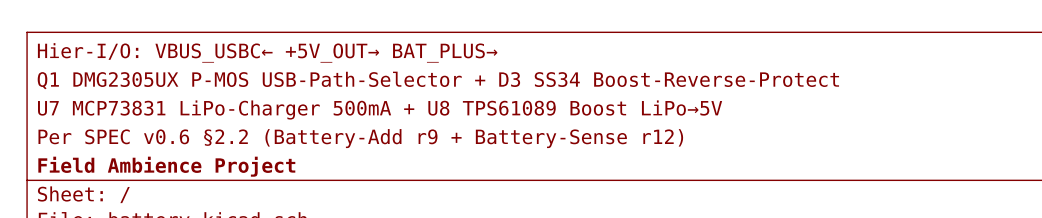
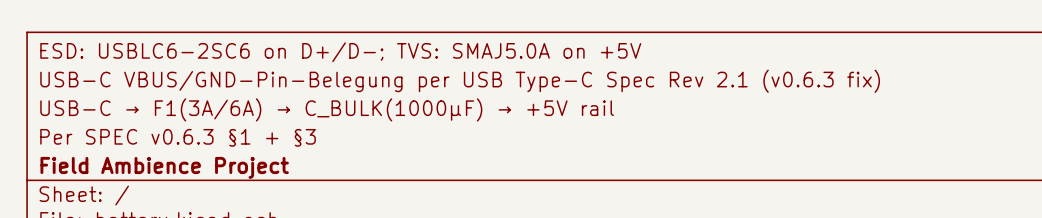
title block: Hier-I/O: VBUS_USBC← +5V_OUT→ BAT_PLUS→ (267, 52) -> ESD: USBLC6-2SC6 on D+/D-; TVS: SMAJ5.0A on +5V (340, 52)
title block: Q1 DMG2305UX P-MOS USB-Path-Selector + D3 SS34 Boost-Reverse-Protect (438, 80) -> USB-C VBUS/GND-Pin-Belegung per USB Type-C Spec Rev 2.1 (v0.6.3 fix) (460, 81)
title block: U7 MCP73831 LiPo-Charger 500mA + U8 TPS61089 Boost LiPo→5V (380, 109) -> USB-C → F1(3A/6A) → C_BULK(1000µF) → +5V rail (327, 109)
title block: Per SPEC v0.6 §2.2 (Battery-Add r9 + Battery-Sense r12) (360, 138) -> Per SPEC v0.6.3 §1 + §3 (178, 137)

